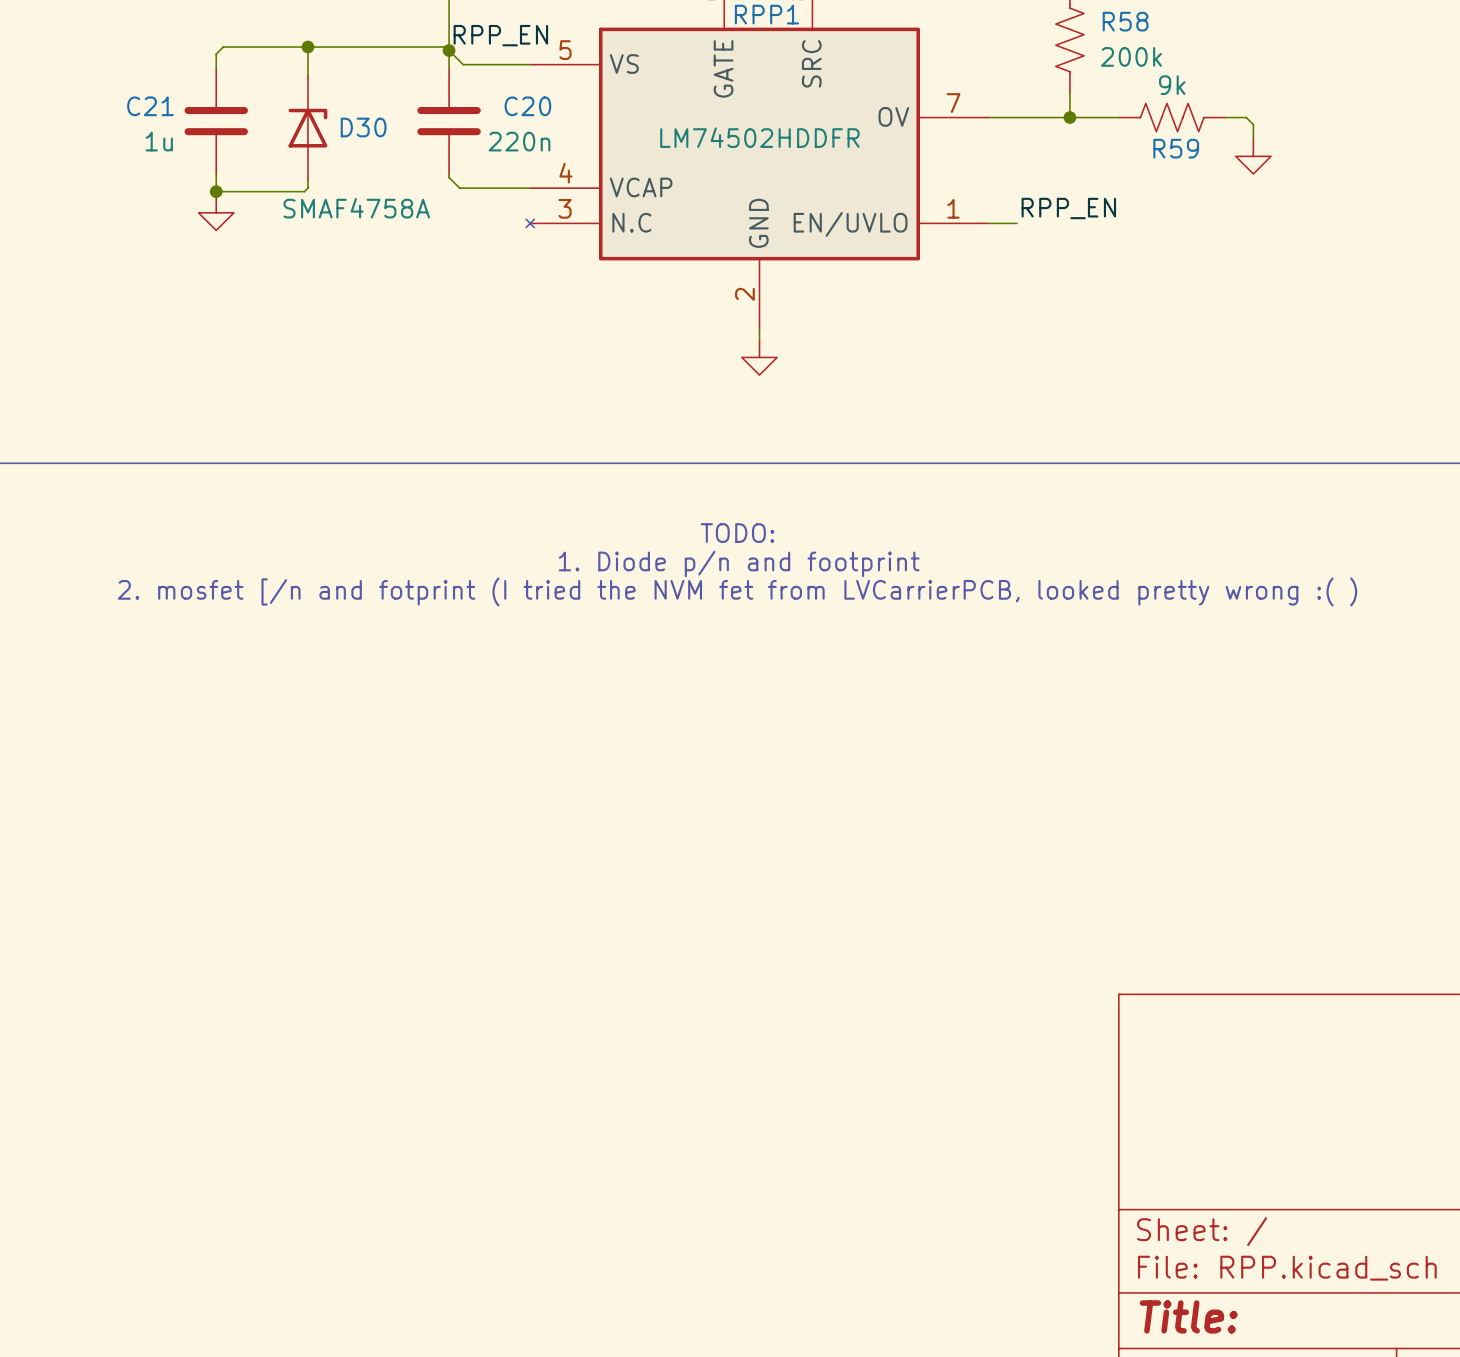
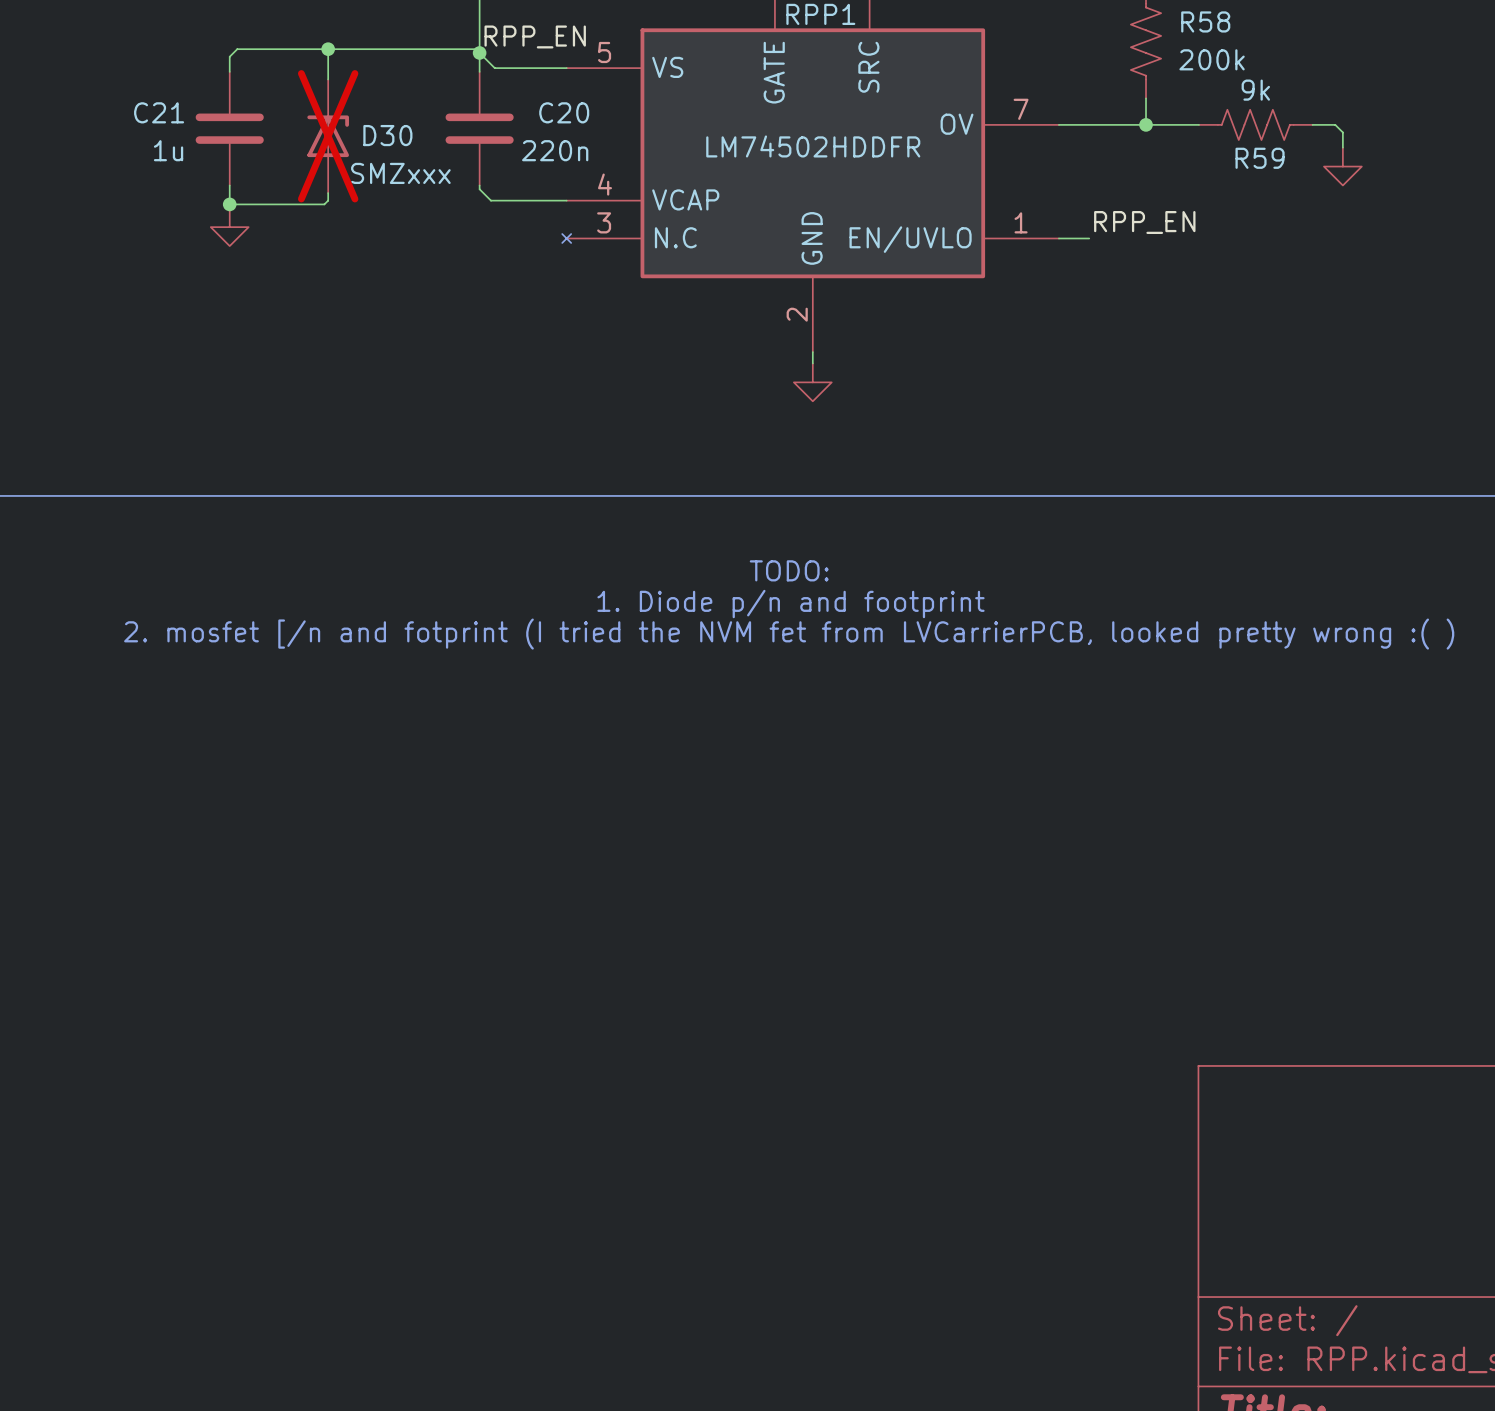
D30 do-not-place cross: none -> (328, 136)
D30 value: SMAF4758A (356, 208) -> SMZxxx (400, 173)

